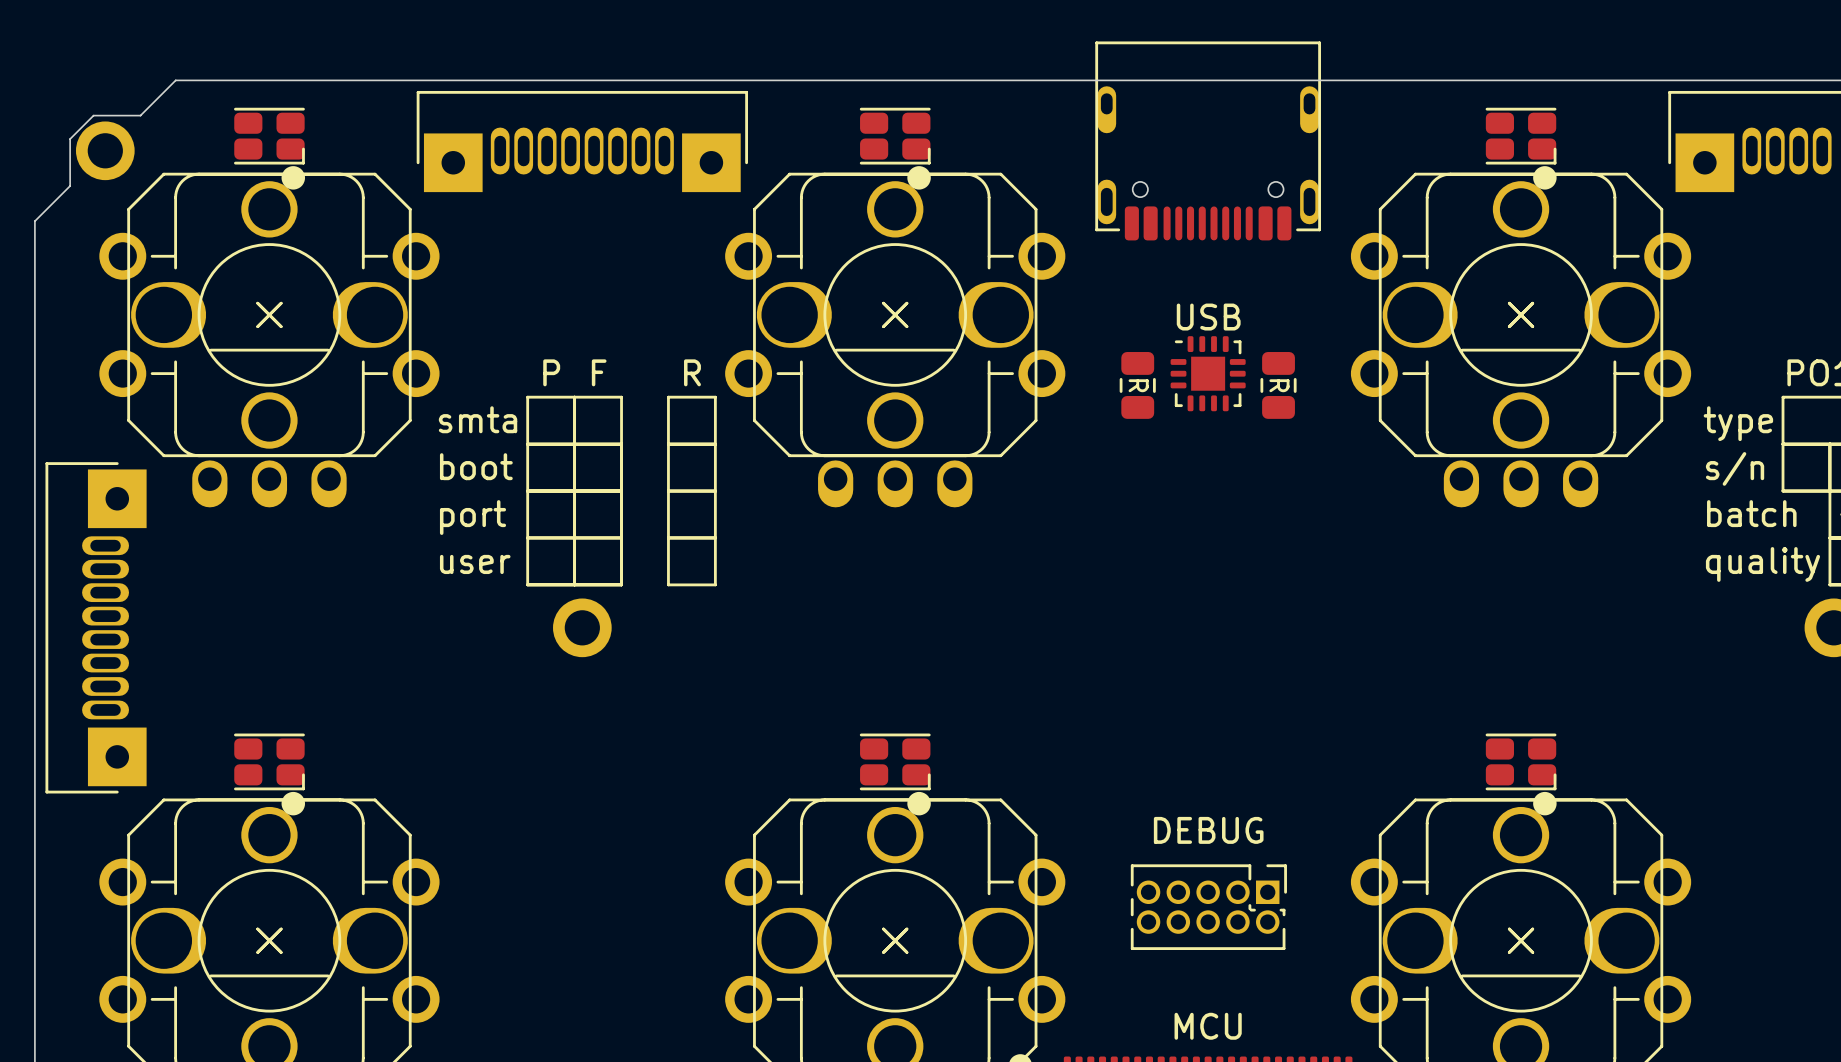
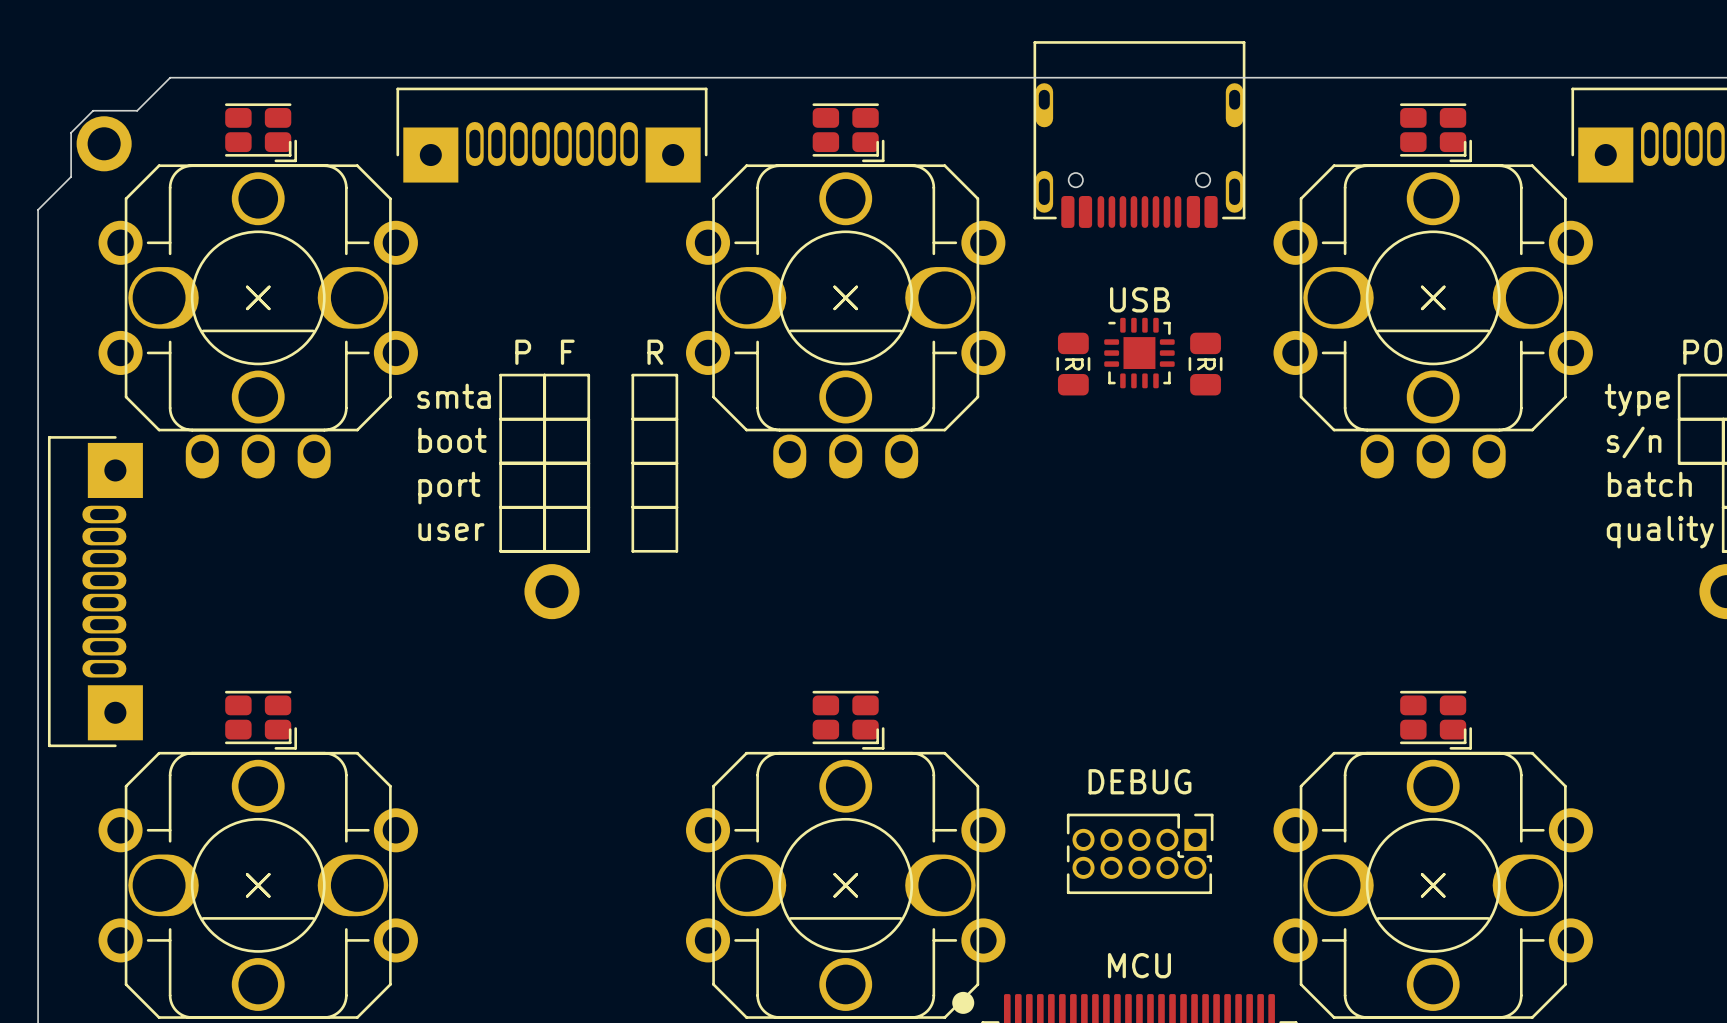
part footprint: [234, 107, 306, 190] -> [224, 103, 298, 163]
part footprint: [859, 107, 931, 190] -> [812, 103, 885, 163]
part footprint: [1485, 107, 1557, 190] -> [1399, 103, 1472, 163]
part footprint: [234, 733, 306, 816] -> [224, 690, 298, 750]
part footprint: [859, 733, 931, 816] -> [812, 690, 885, 750]
part footprint: [1485, 733, 1557, 816] -> [1399, 690, 1472, 750]

